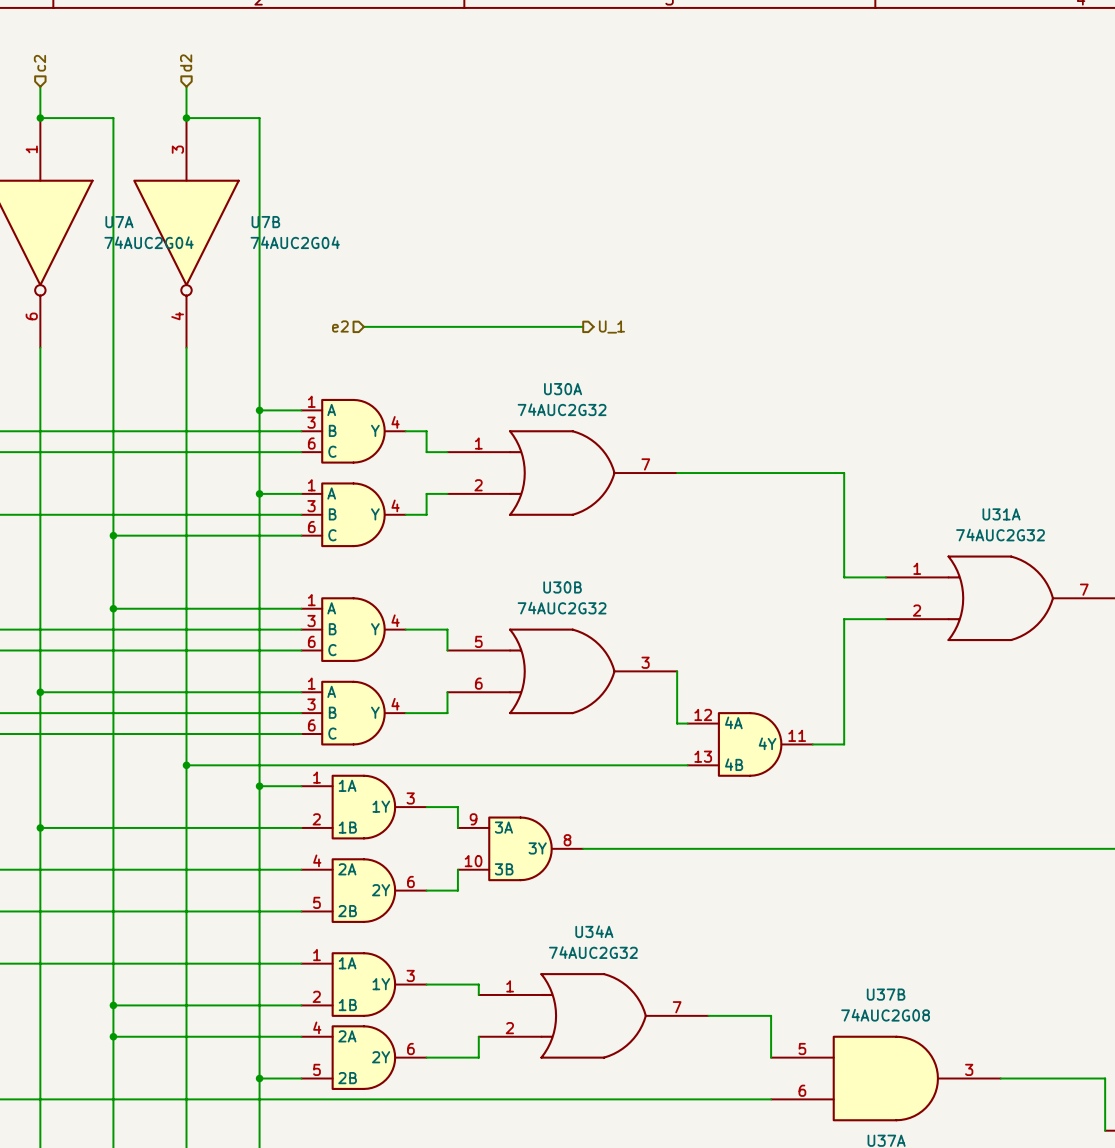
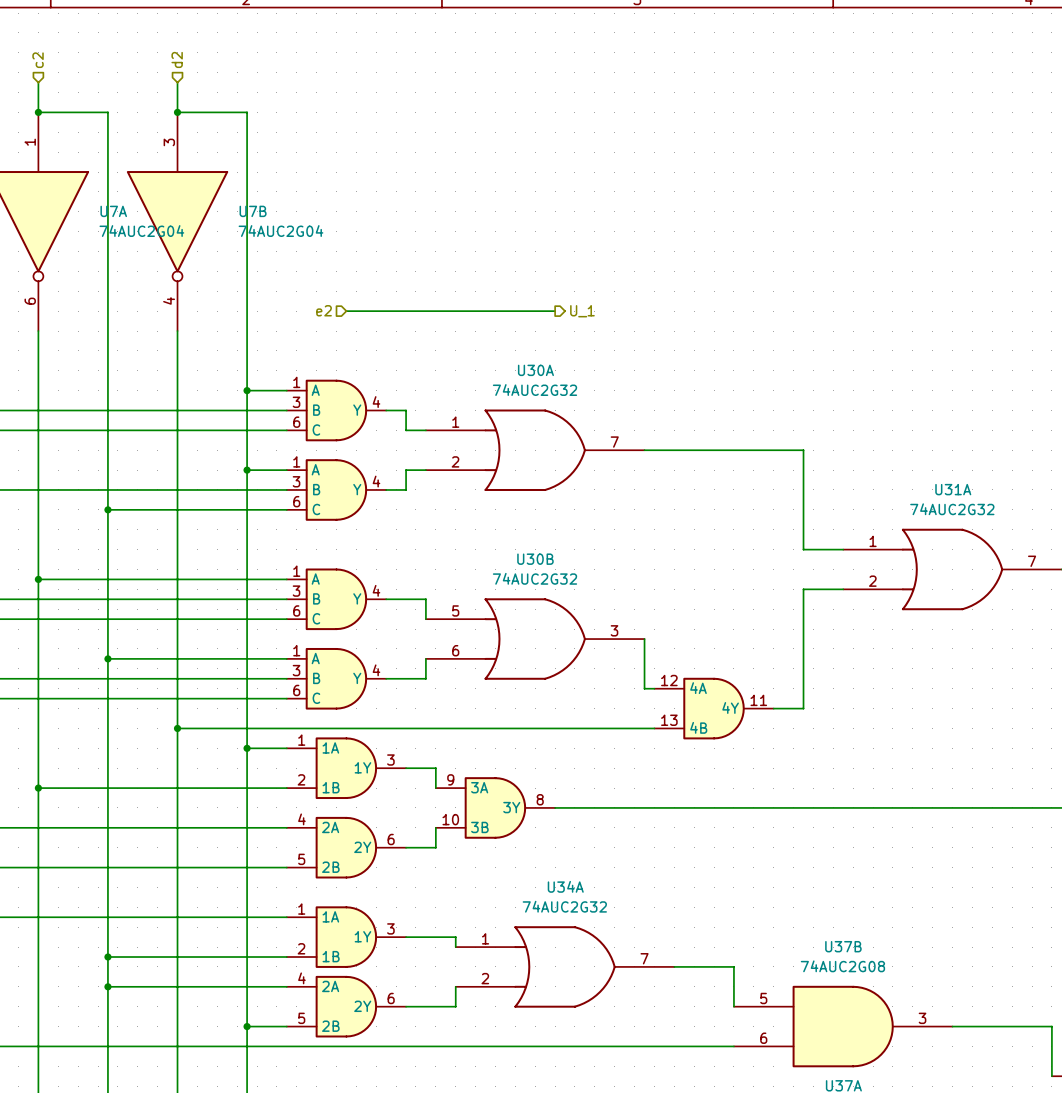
junction: none -> (38, 579)
junction: (113, 608) -> none
wire: (40, 692) (113, 692) -> (38, 579) (107, 579)
junction: (40, 692) -> none
junction: none -> (107, 658)

